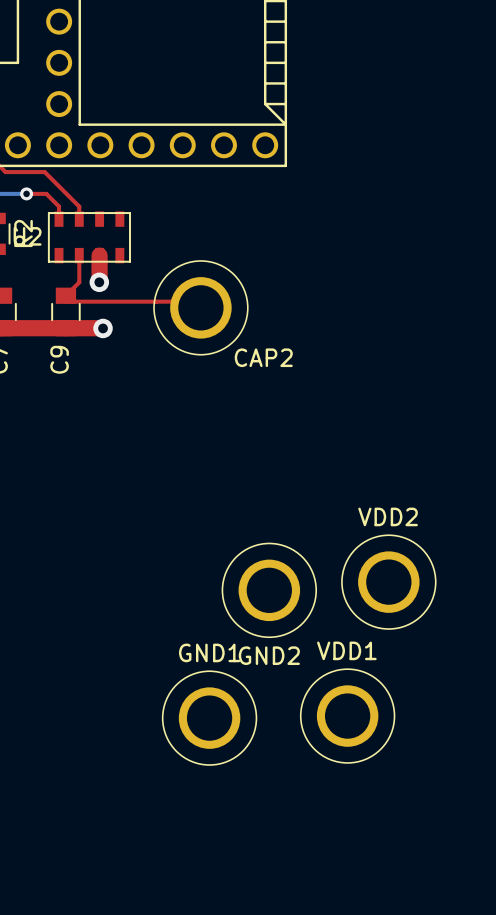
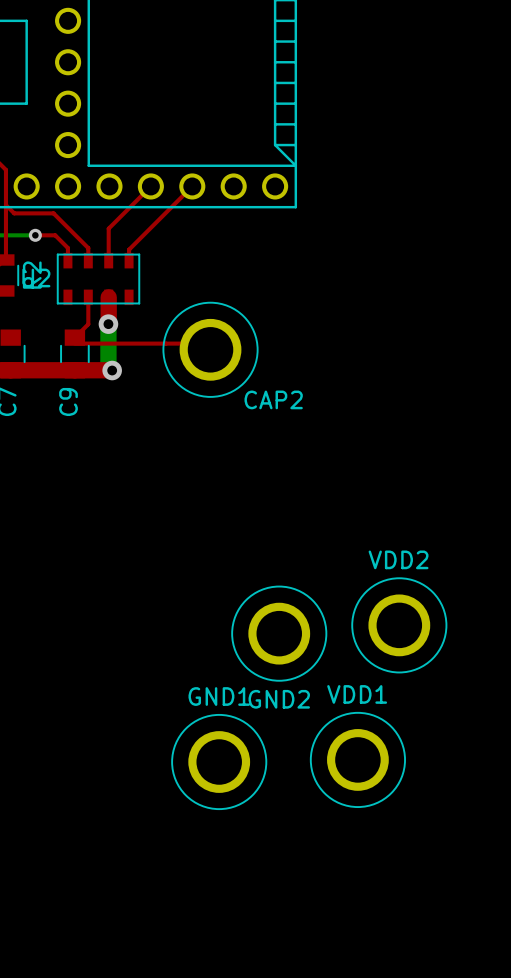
top track: none -> (150, 186) (108, 228) (108, 260)
top track: none -> (192, 186) (129, 249) (129, 260)
bottom track: none -> (108, 324) (108, 370)

